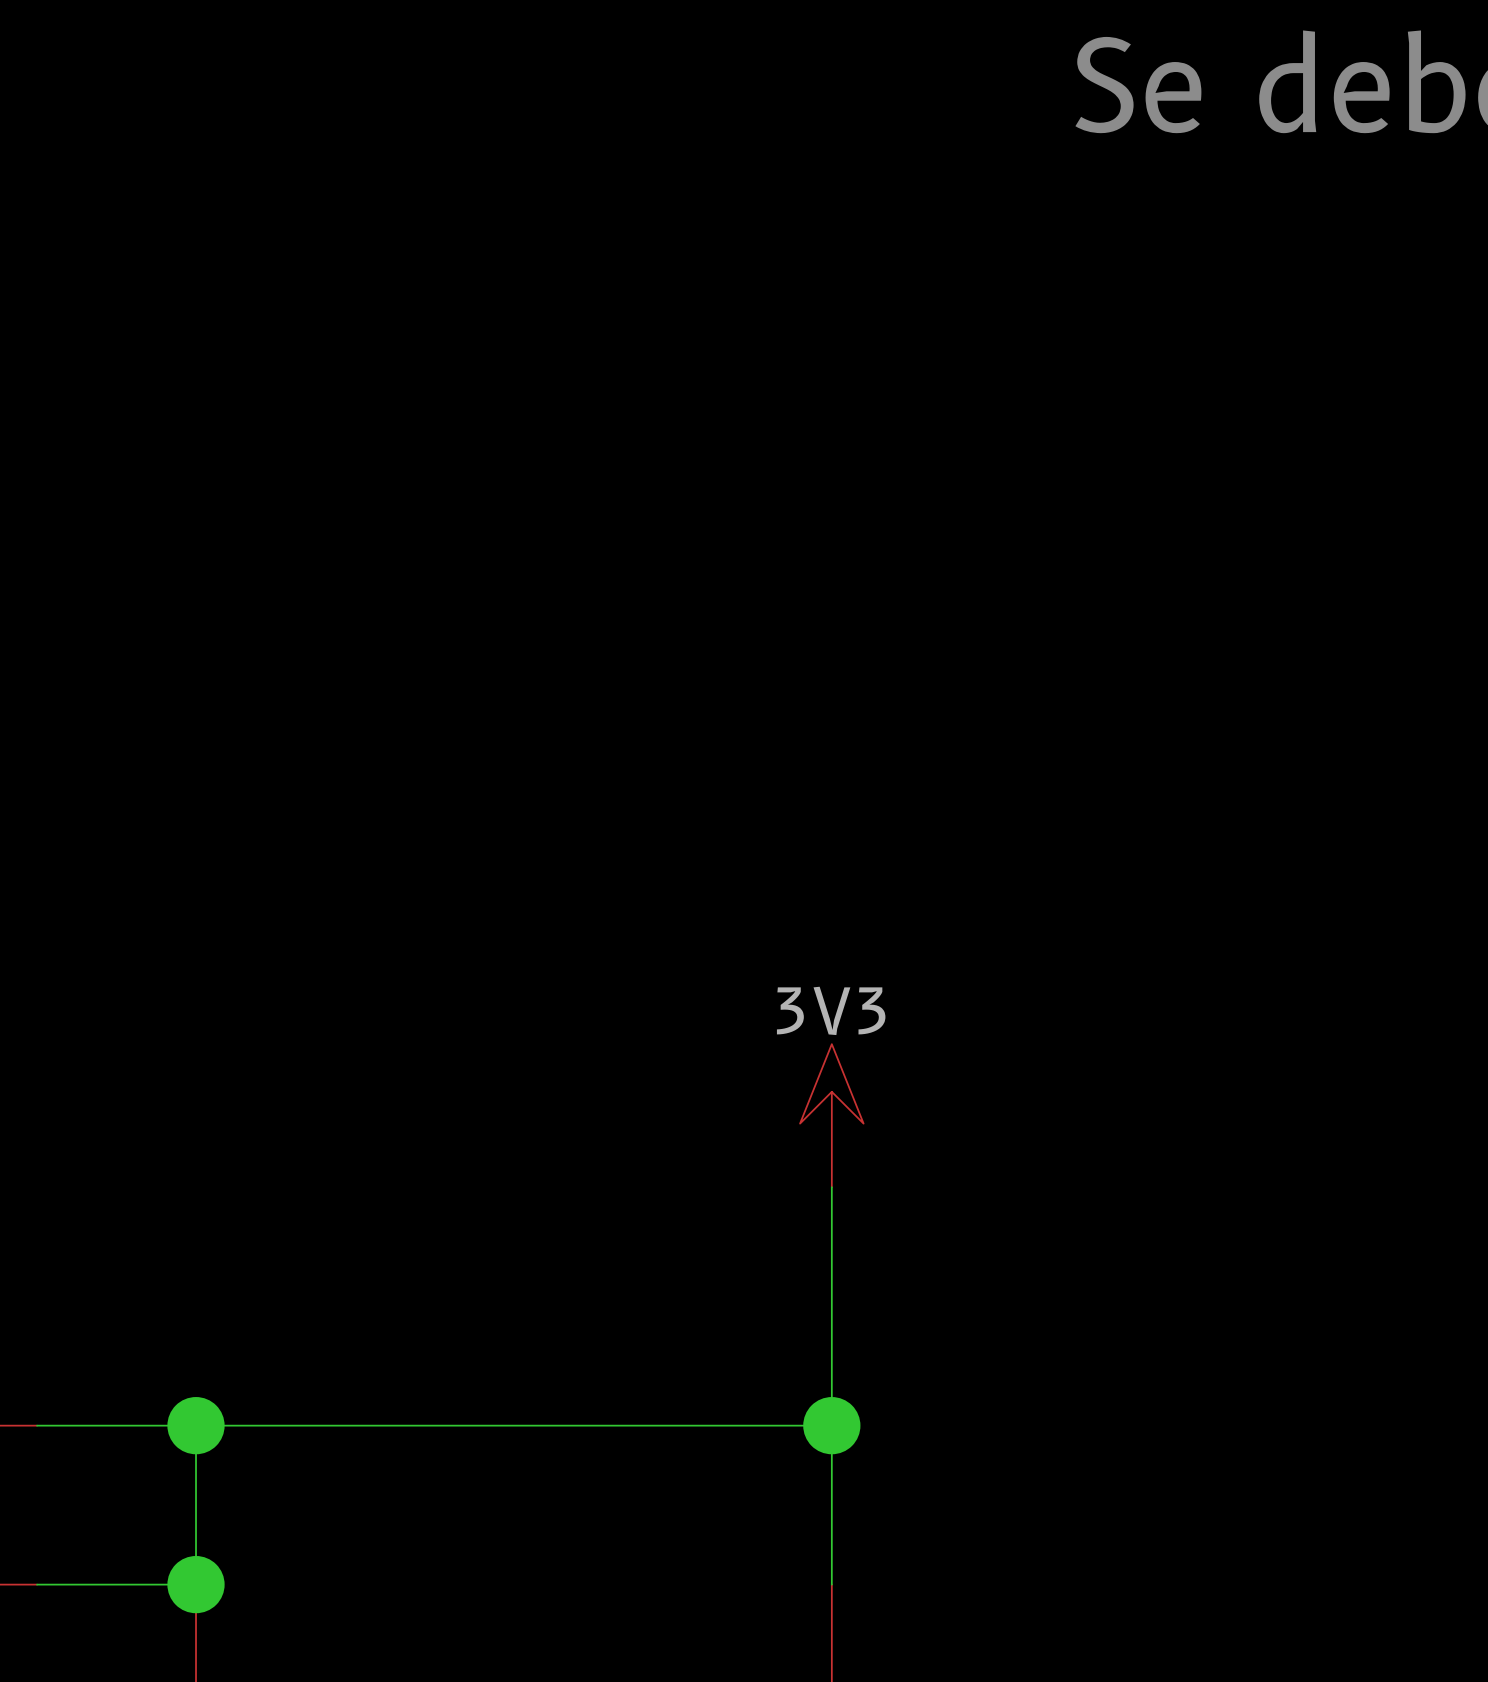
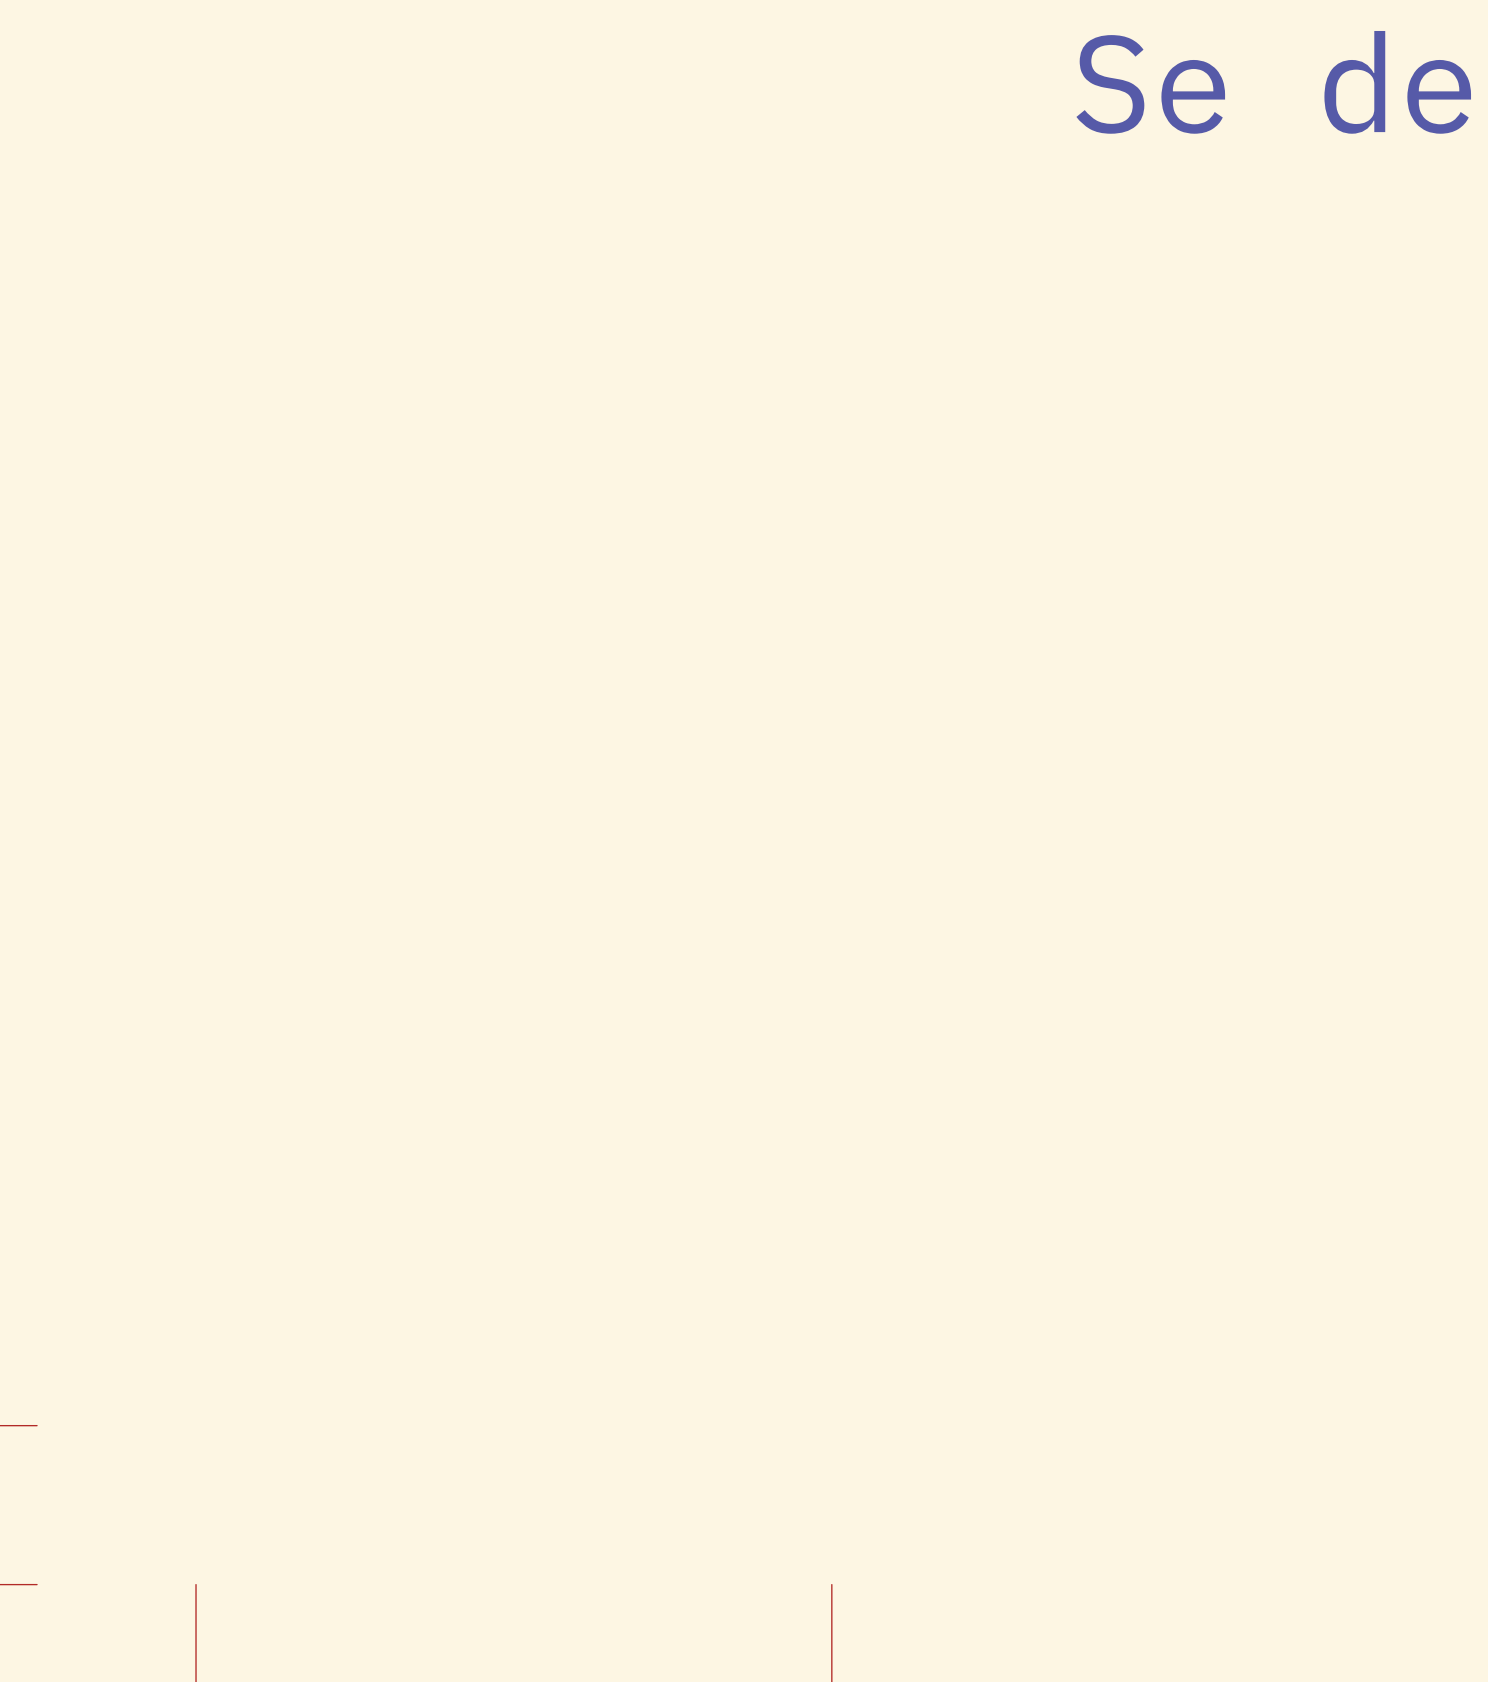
power symbol: 3V3 (831, 1115) -> none
wire: (831, 1187) (831, 1584) -> none
wire: (37, 1425) (831, 1425) -> none
wire: (196, 1425) (196, 1584) (37, 1584) -> none
junction: (196, 1425) -> none
junction: (831, 1425) -> none
junction: (196, 1584) -> none

